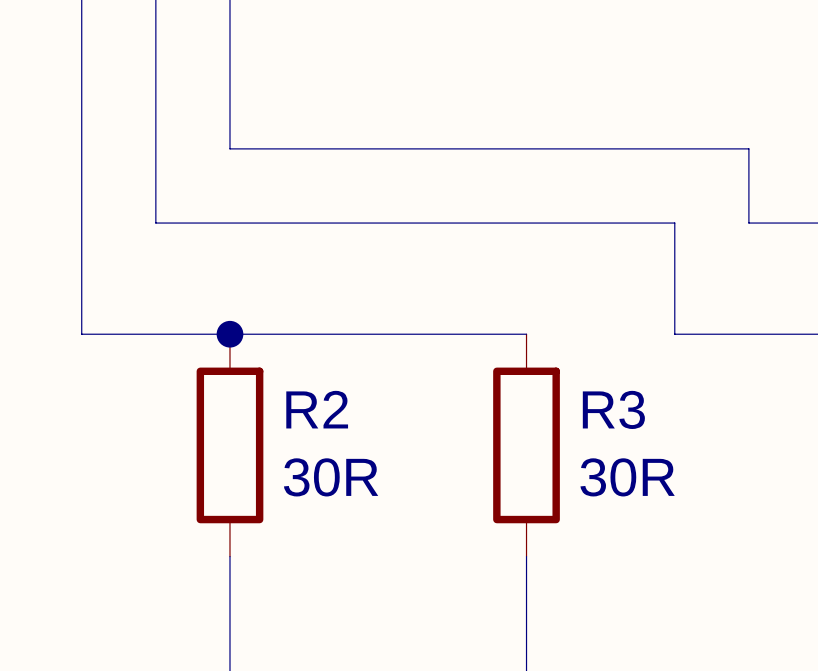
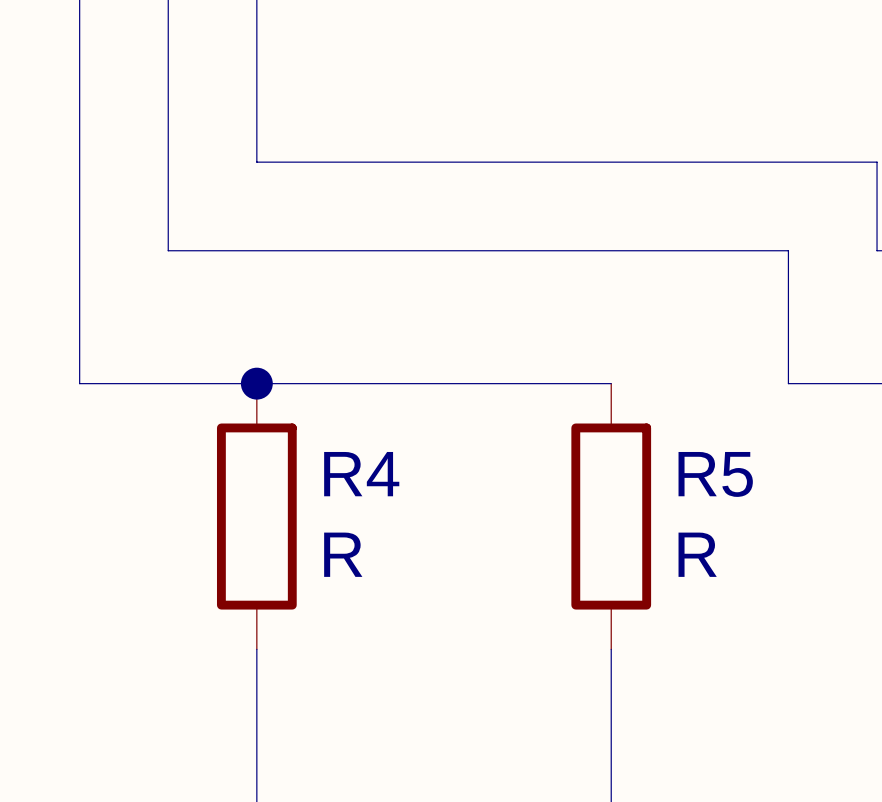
R2 name: R2 (317, 409) -> R4 (361, 474)
R3 name: R3 (613, 409) -> R5 (715, 474)
R2 value: 30R (331, 477) -> R (343, 554)
R3 value: 30R (627, 477) -> R (697, 554)

